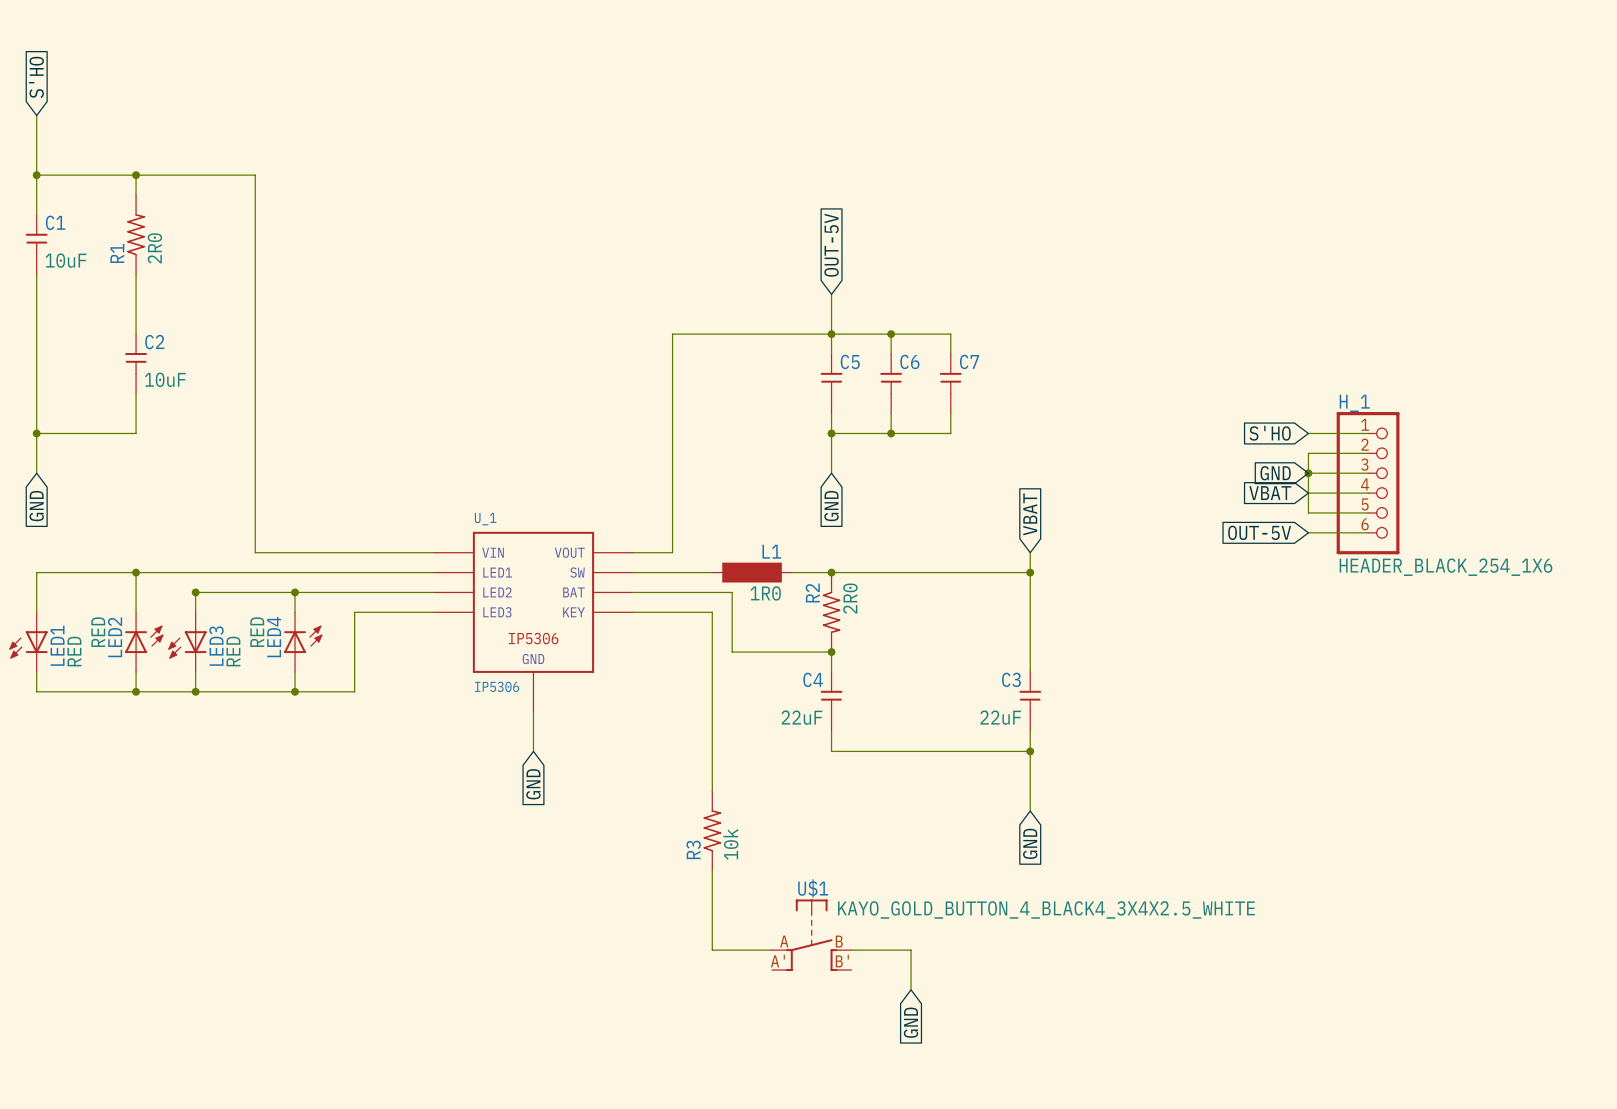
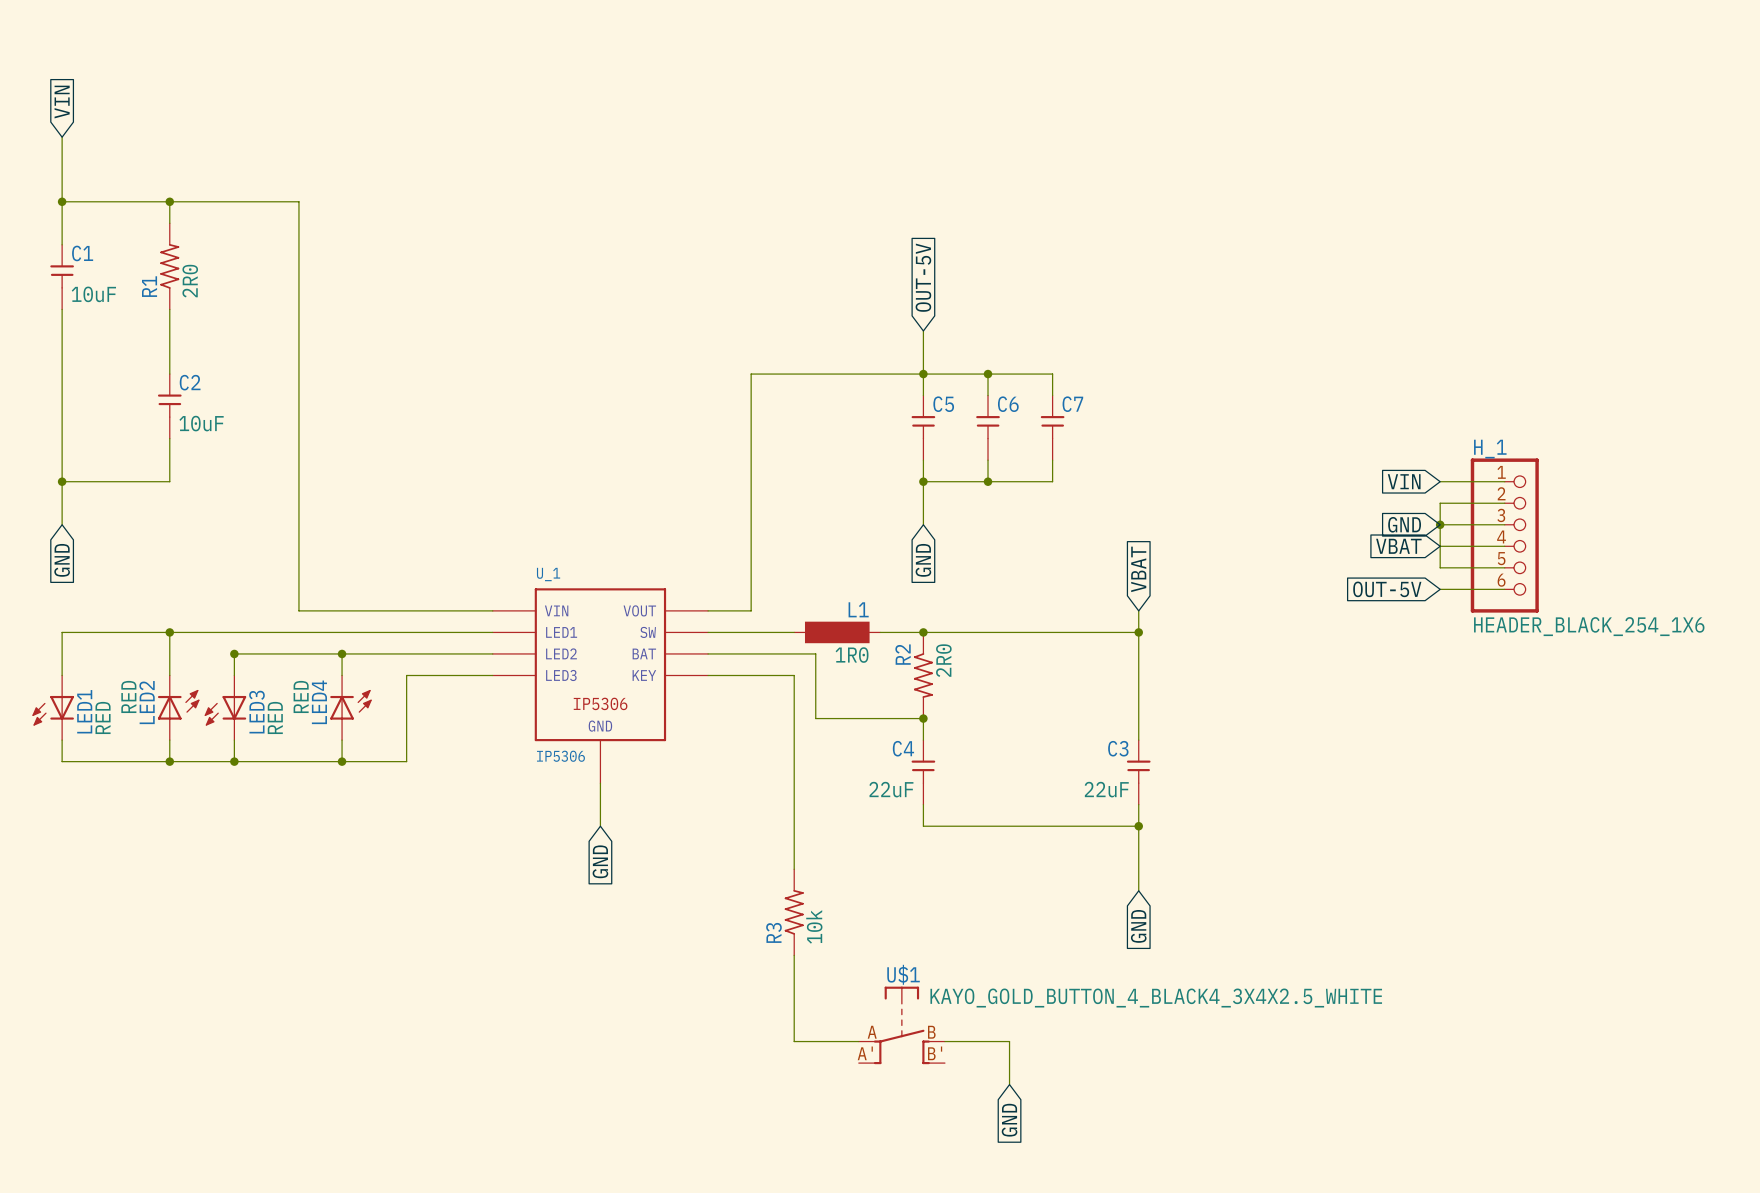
global label: S'HO (36, 77) -> VIN (62, 102)
global label: S'HO (1270, 433) -> VIN (1404, 481)

